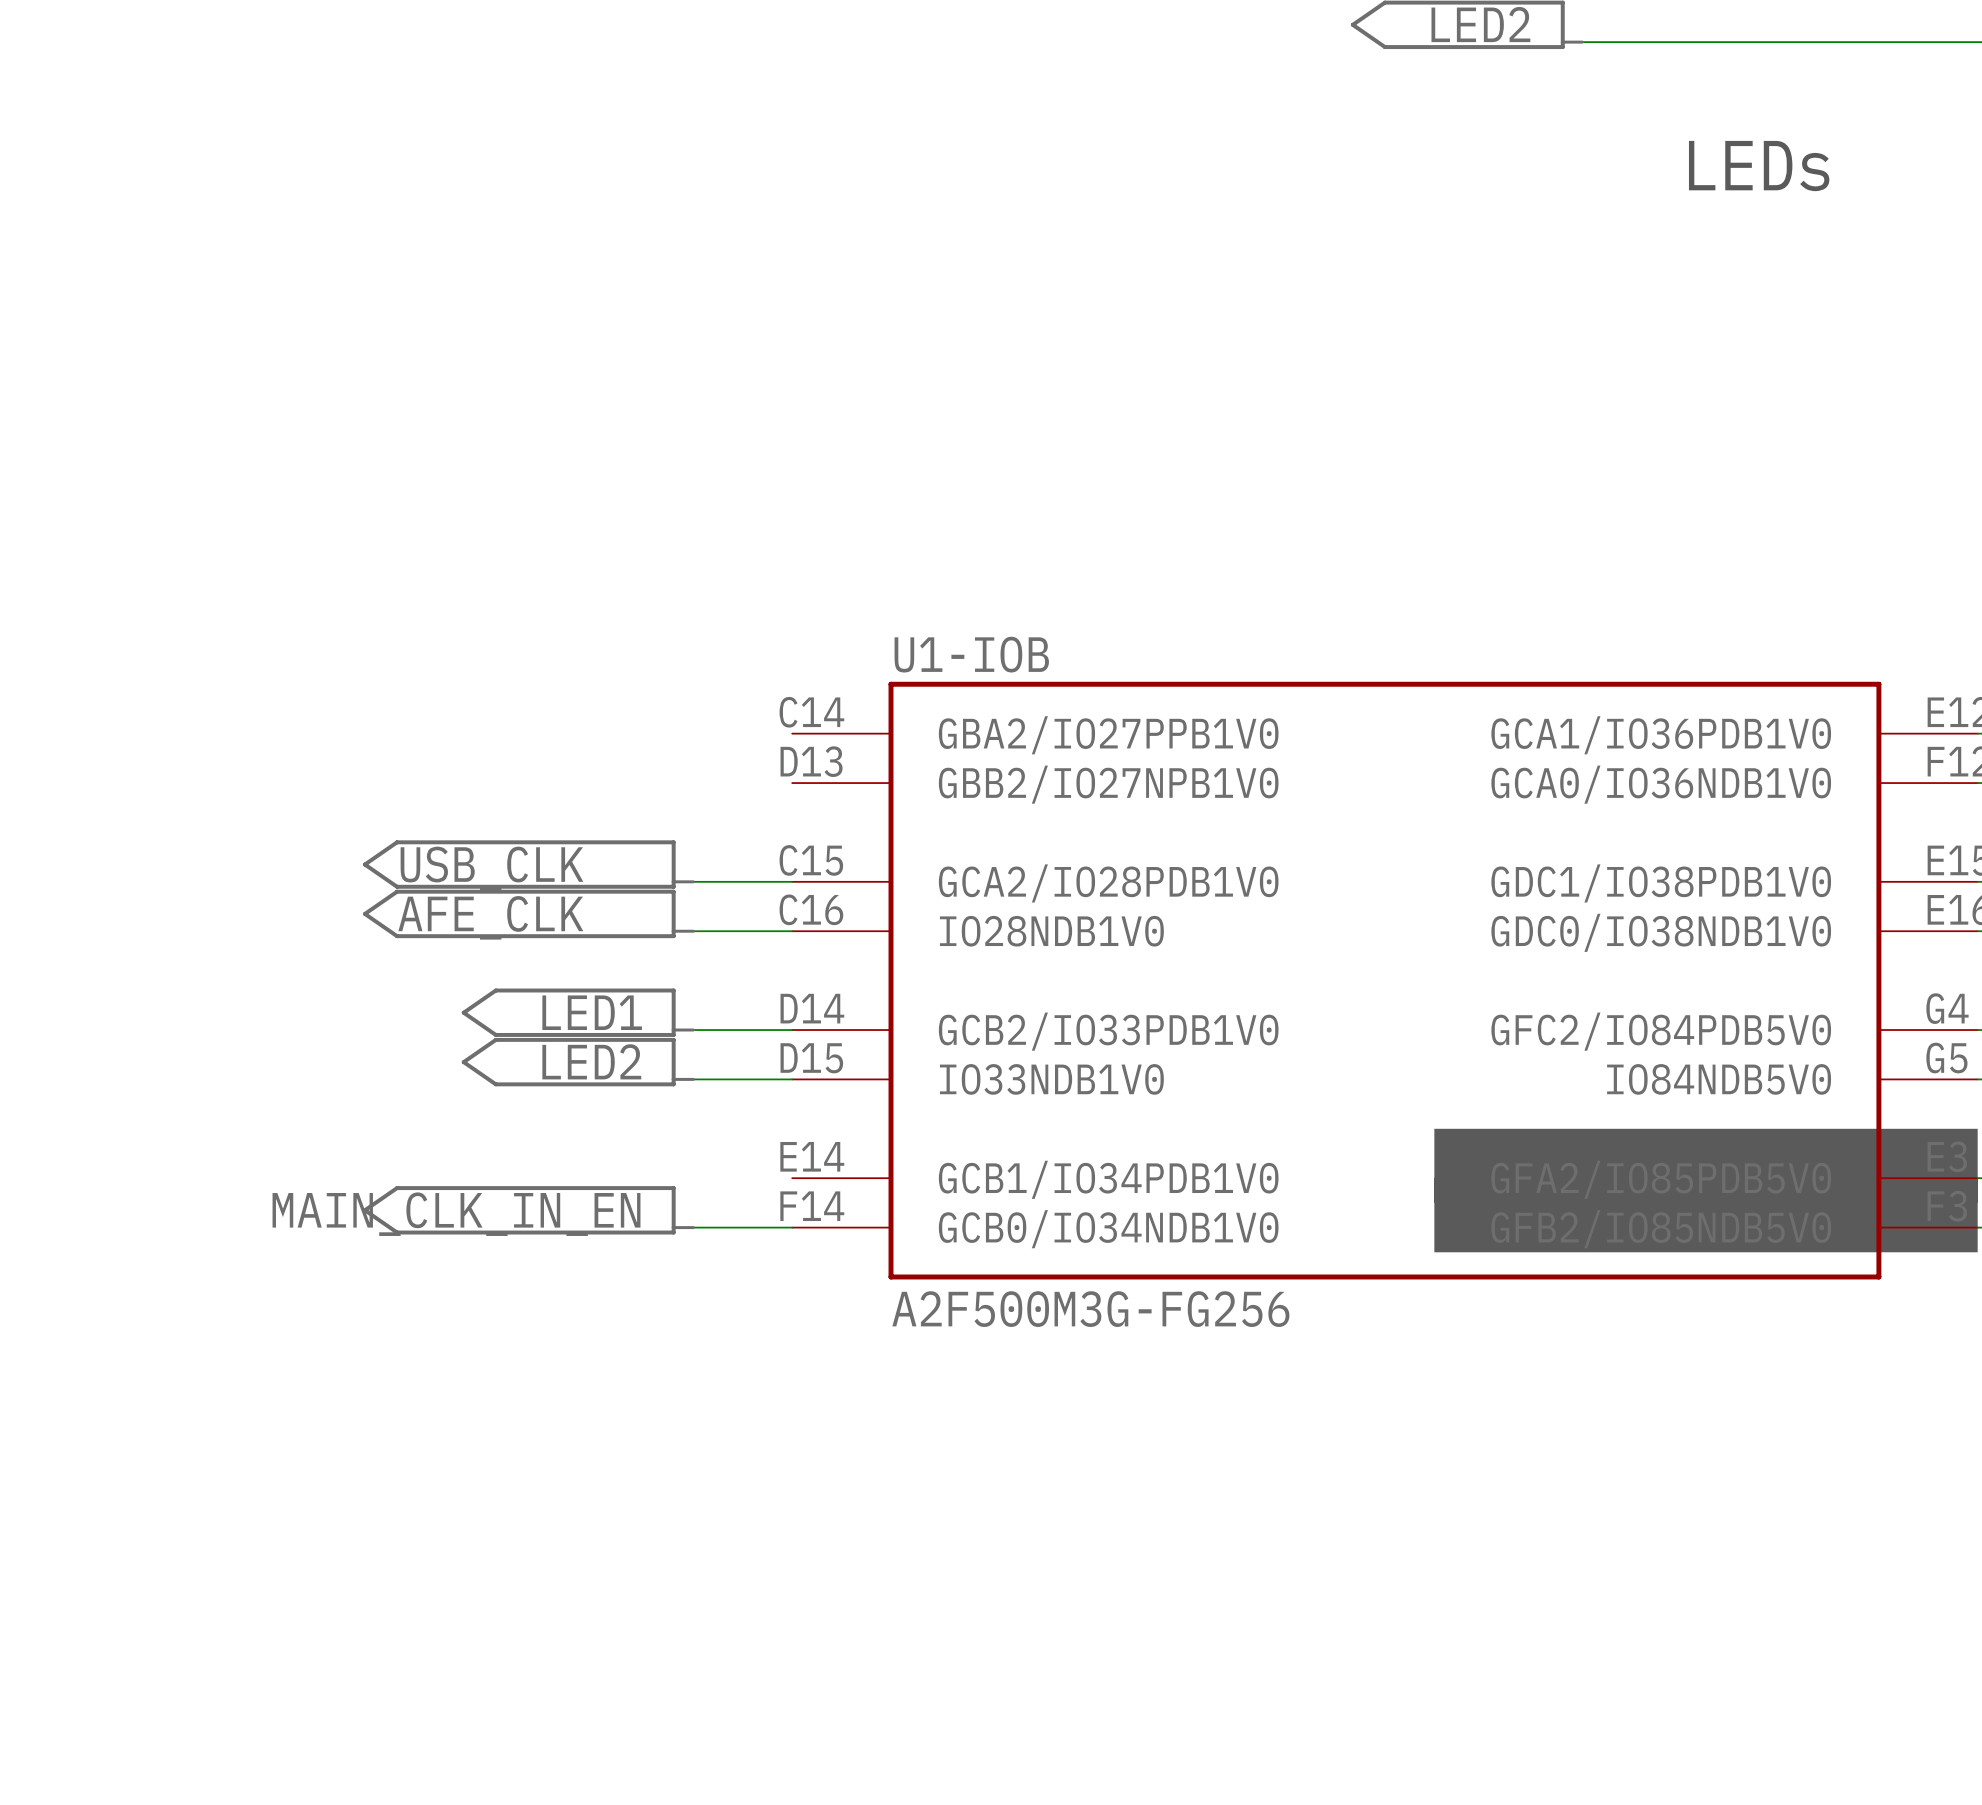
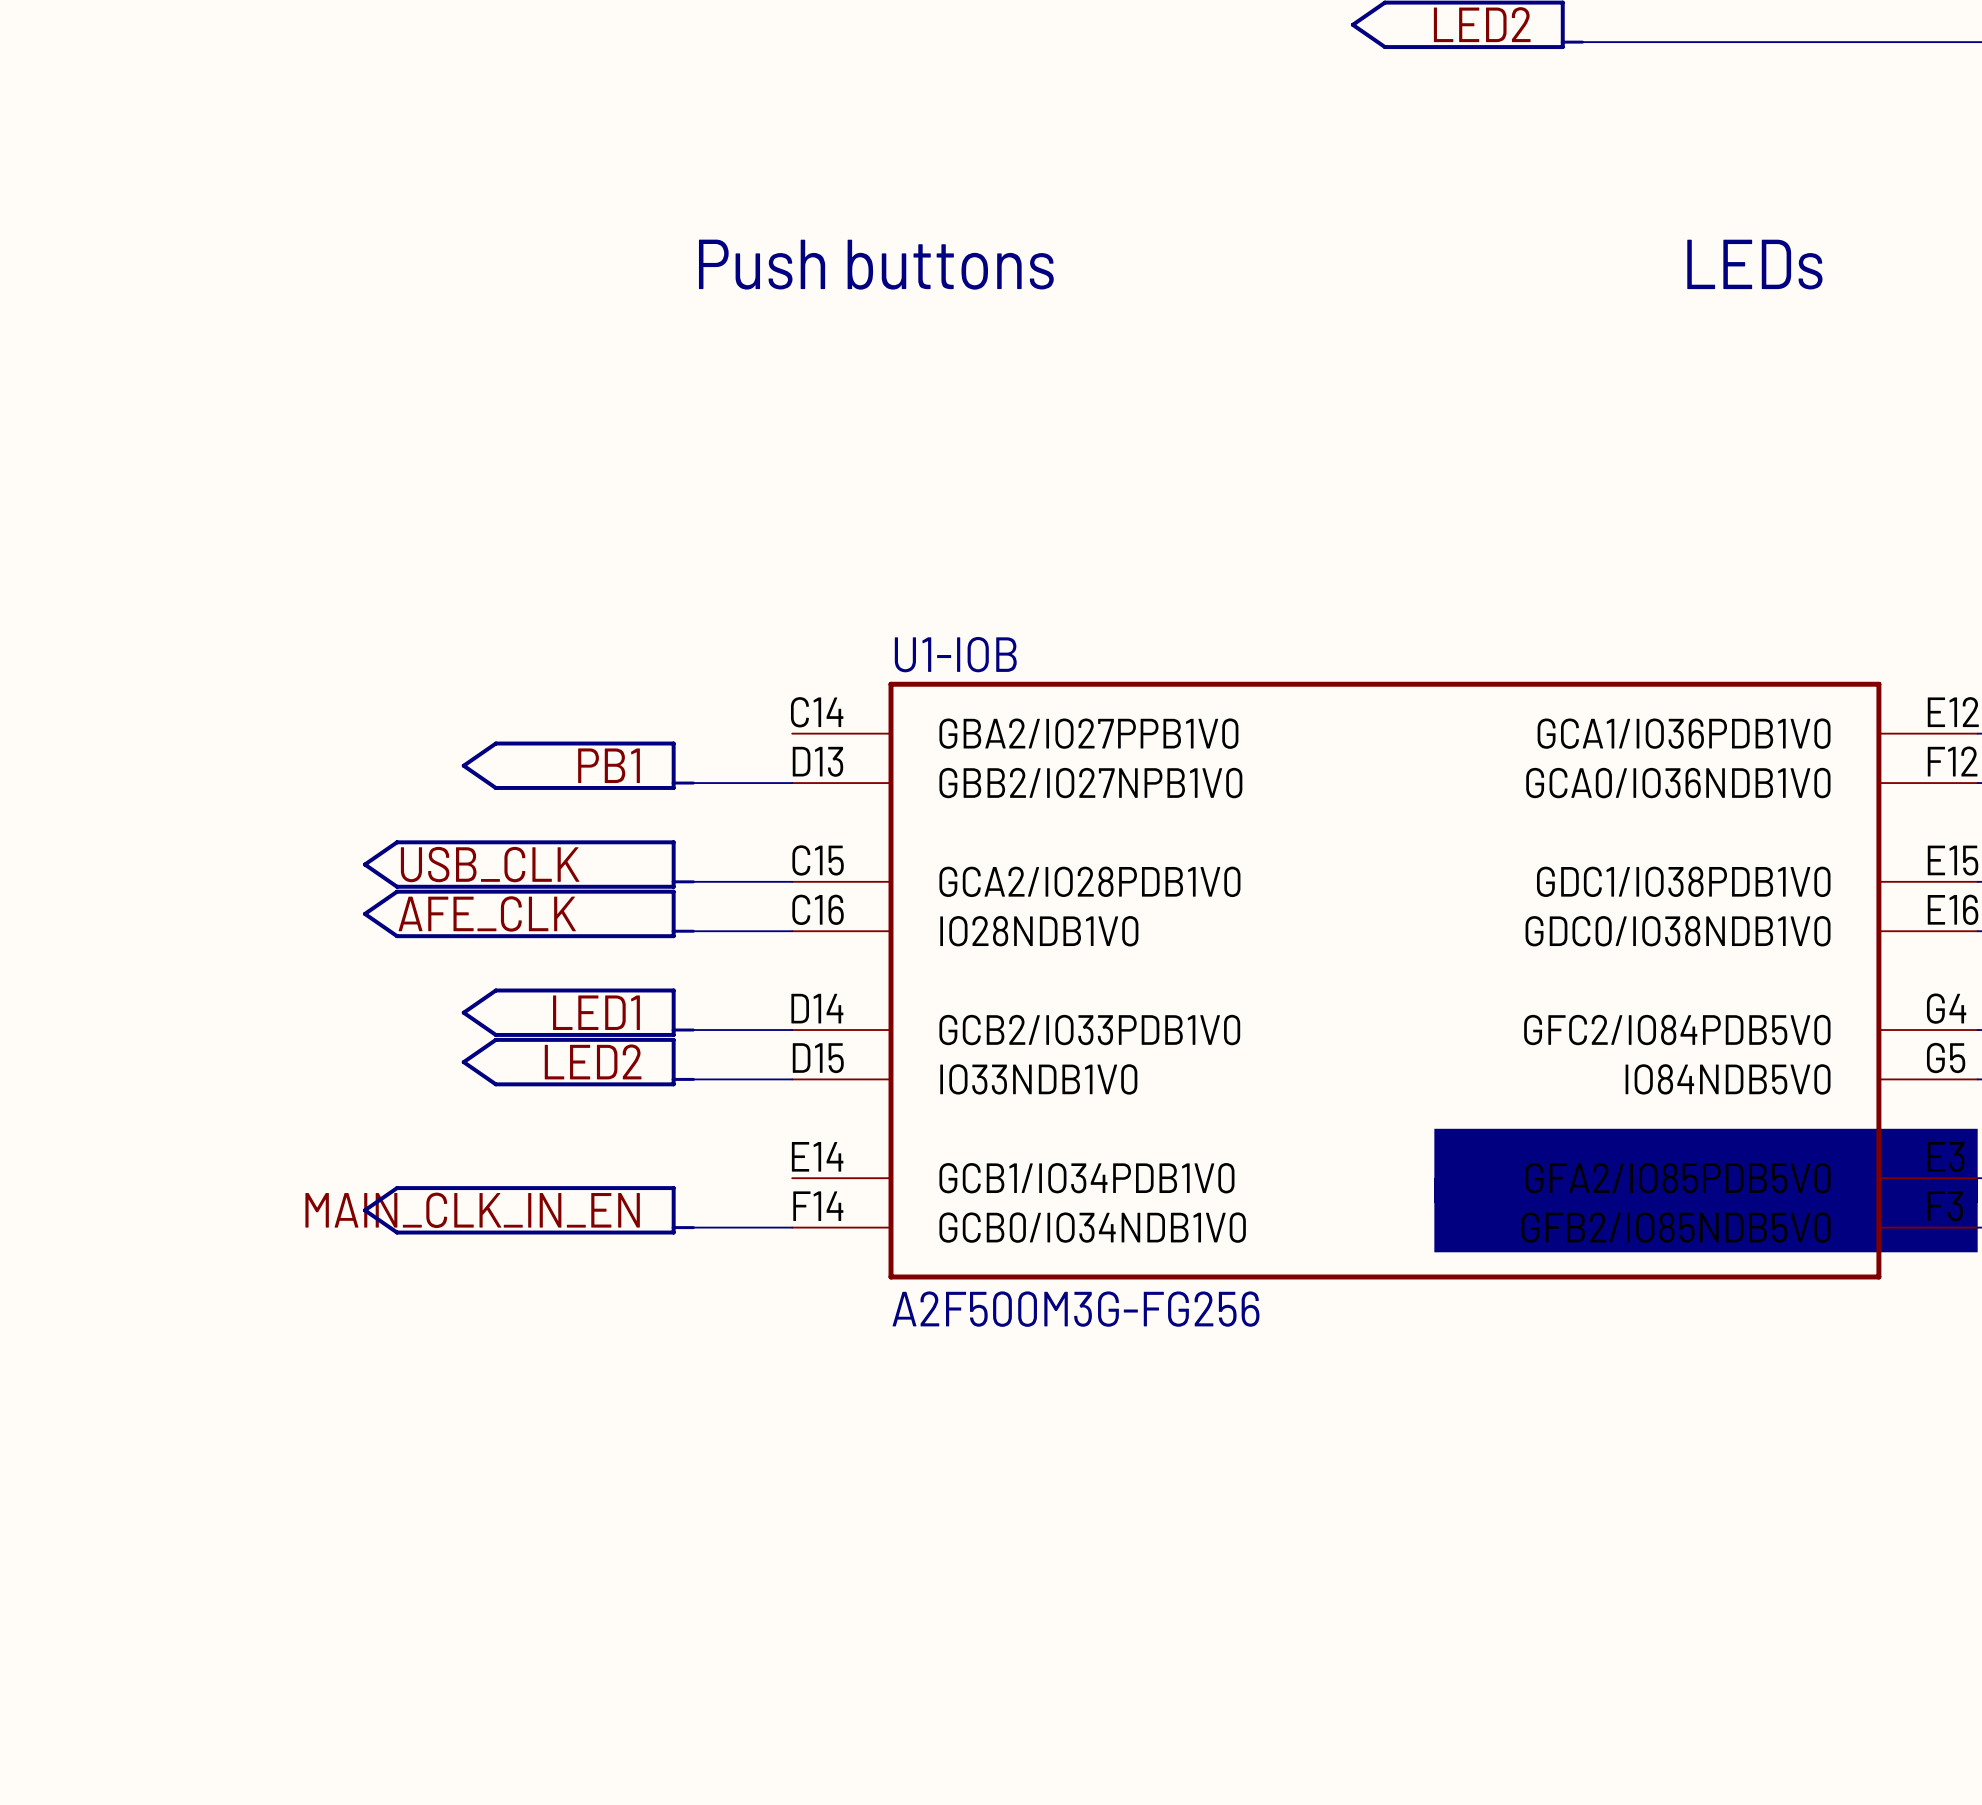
text position: LEDs (1759, 166) -> LEDs (1754, 264)
text: none -> Push buttons (876, 264)
part: none -> (578, 765)
label: none -> PB1 (609, 765)
wire: none -> (693, 783) (792, 783)

